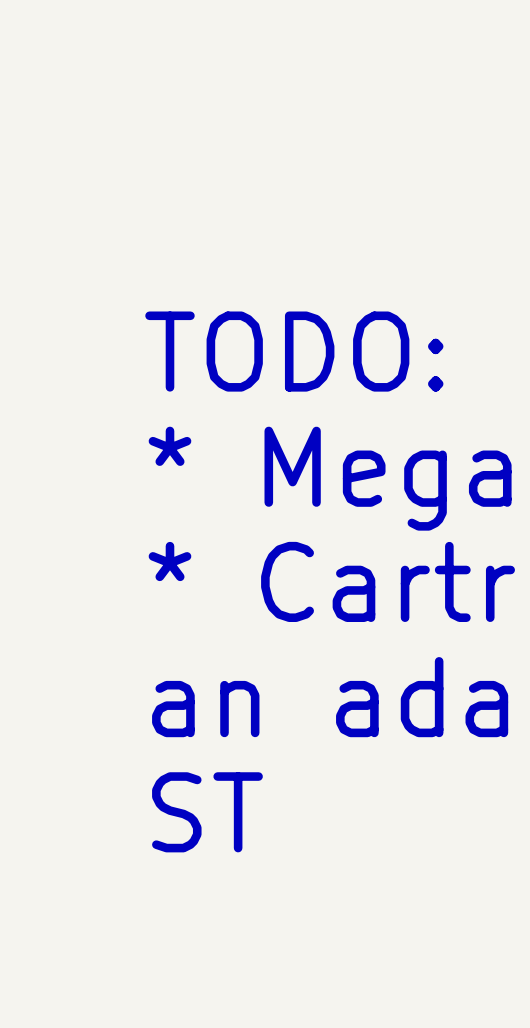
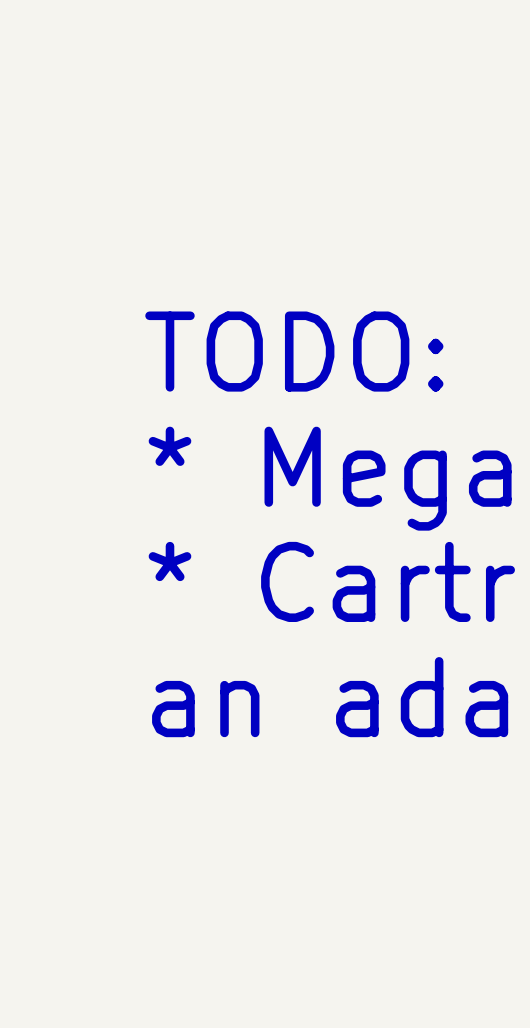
text: ST (207, 812) -> none

